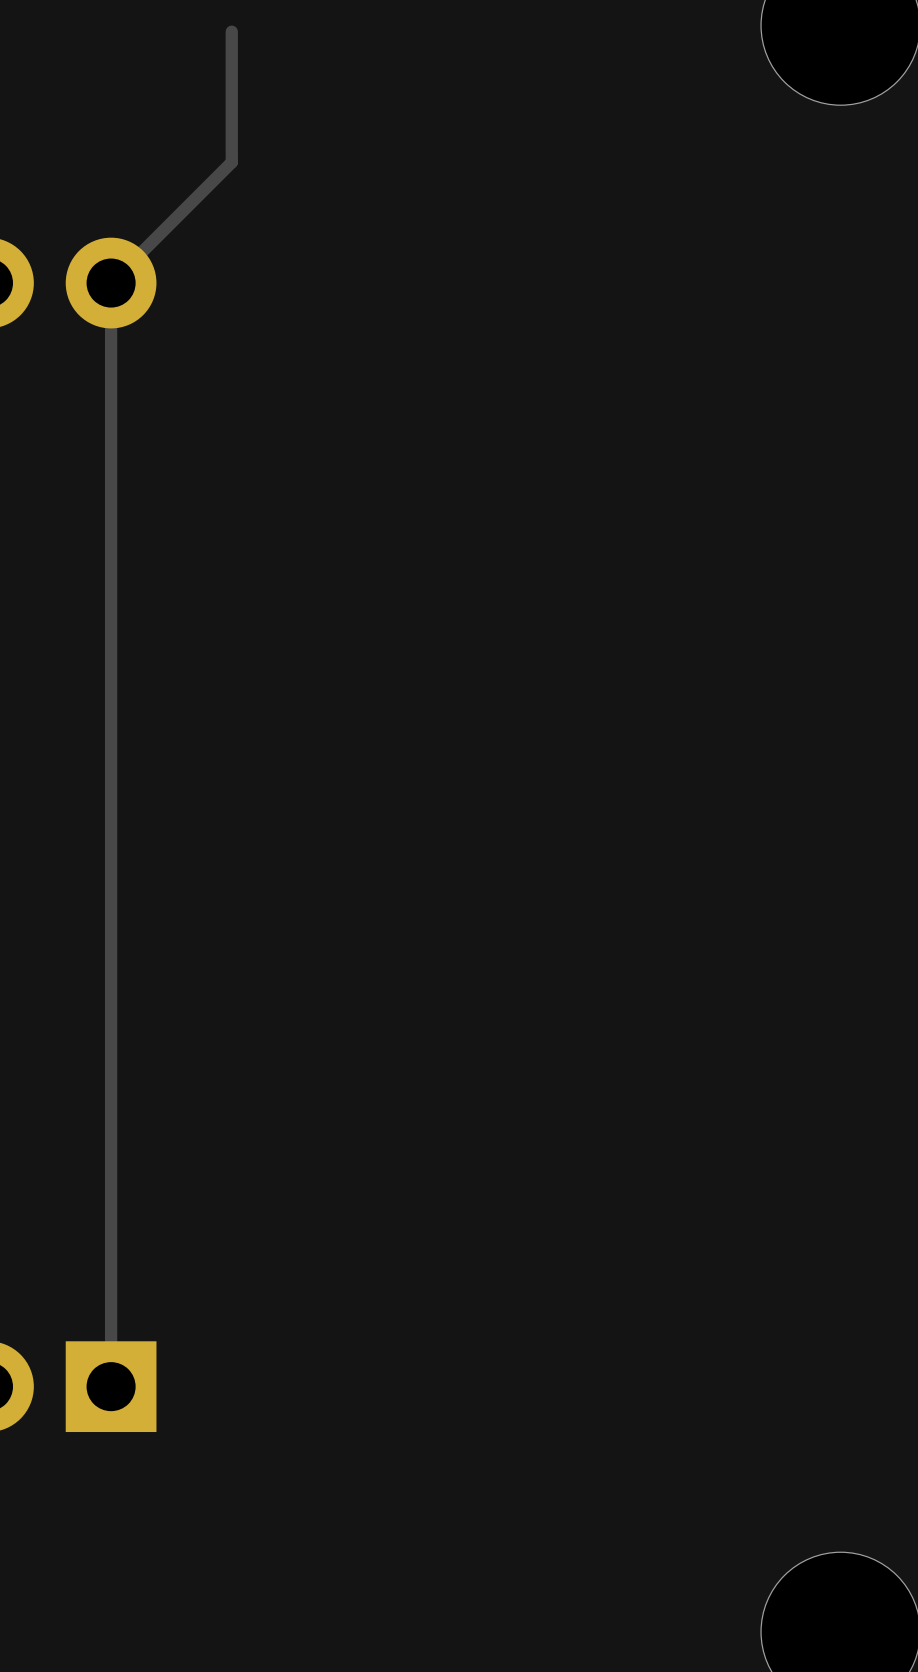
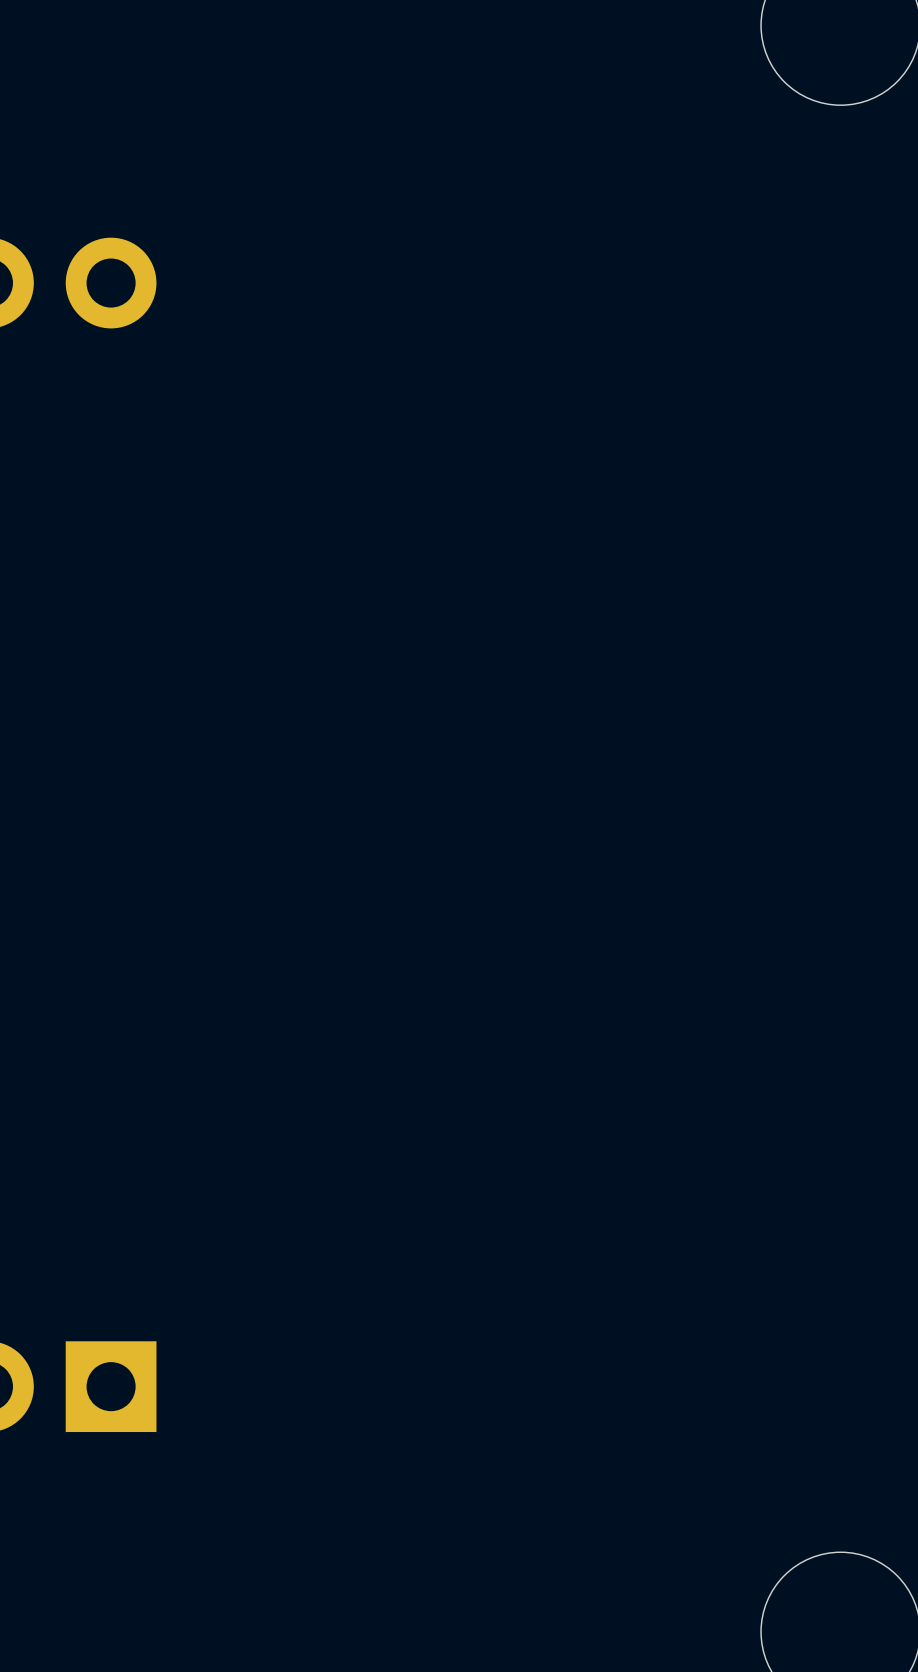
track: (231, 31) (231, 162) (111, 283) (111, 1386) -> none

